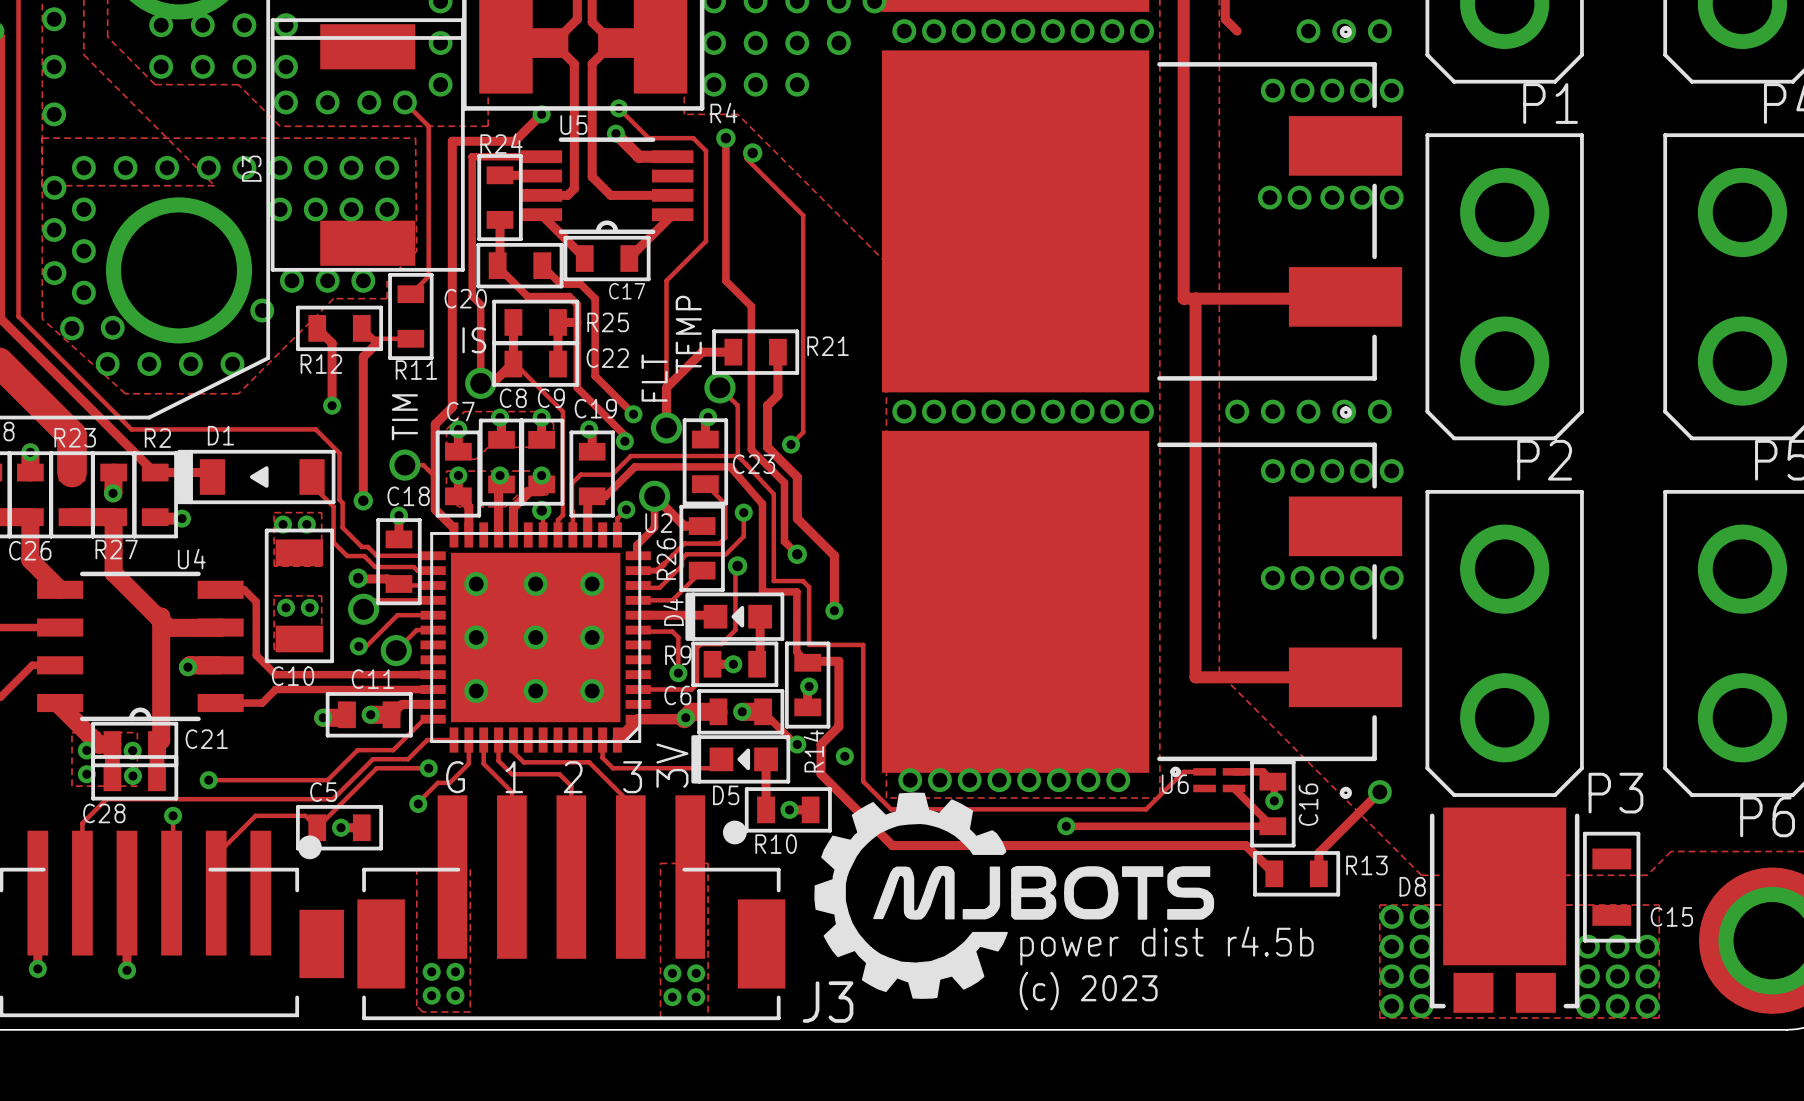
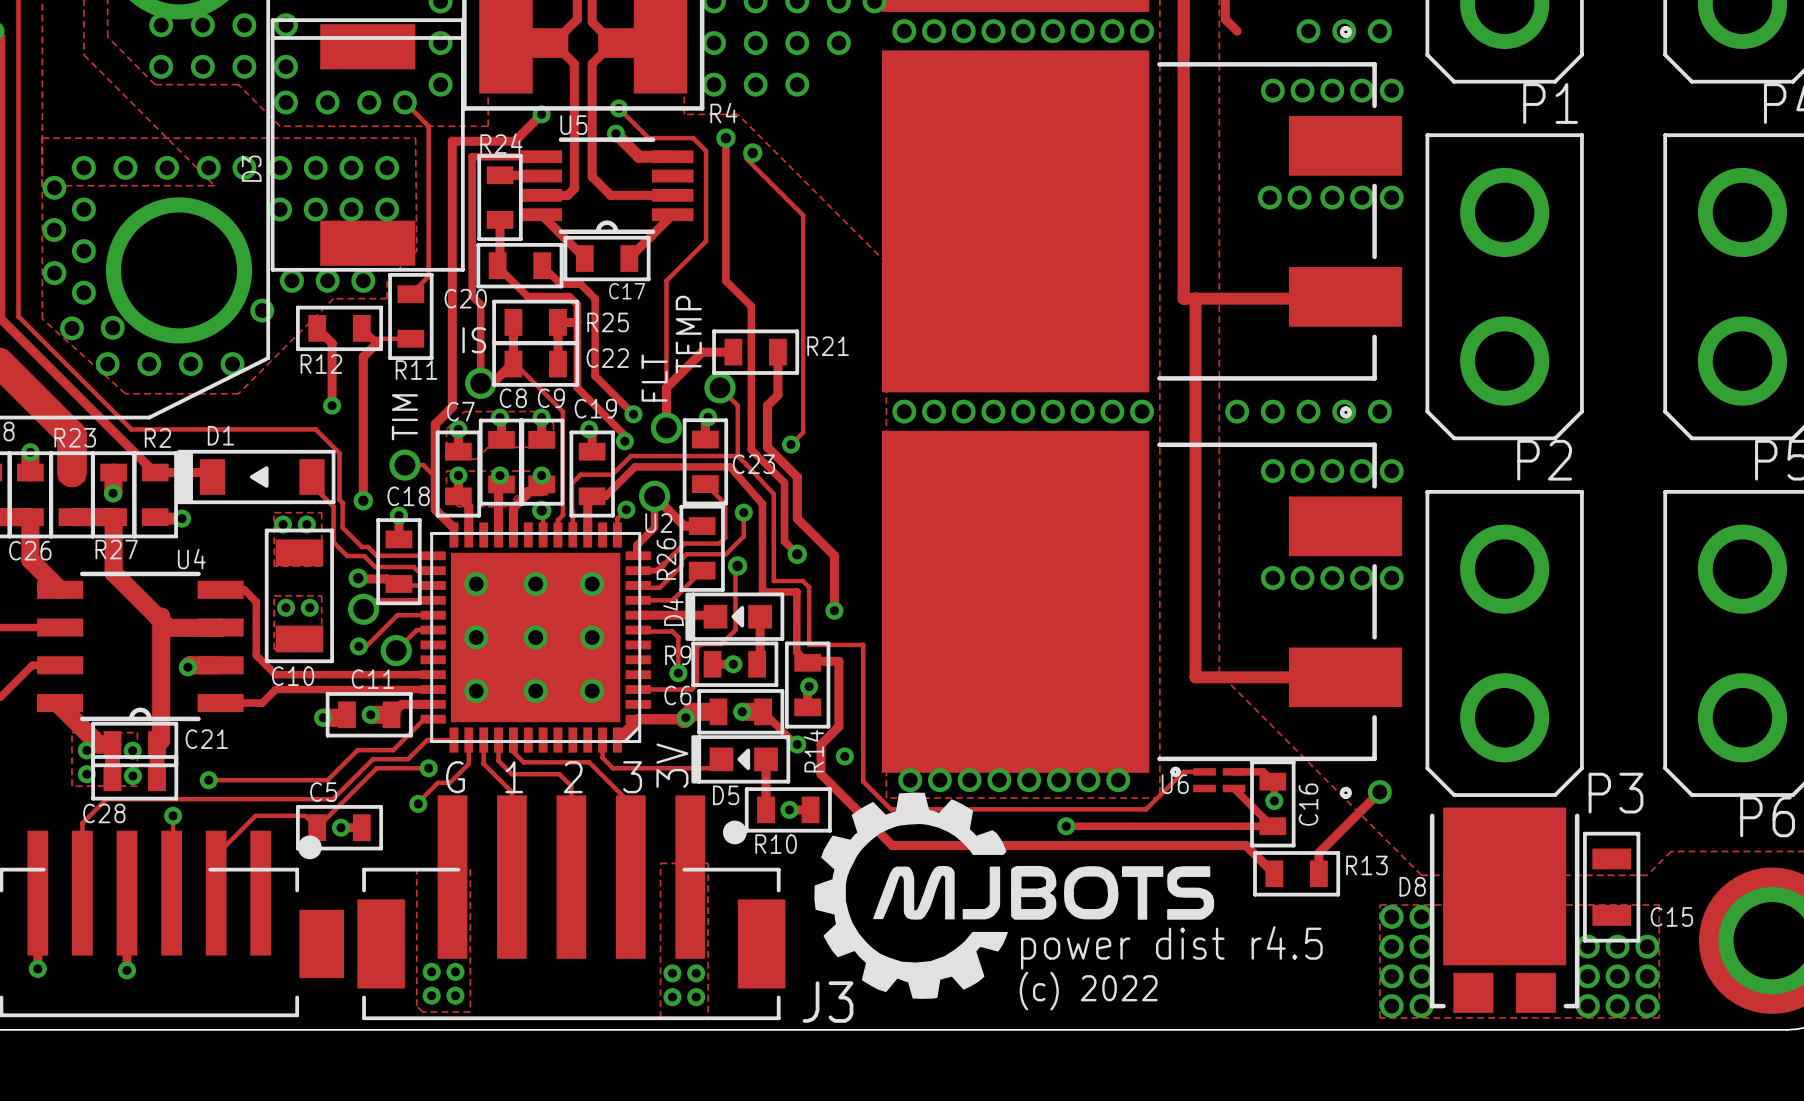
via: (54, 19) -> none
via: (54, 66) -> none
via: (54, 114) -> none
text: power dist r4.5b (1166, 945) -> power dist r4.5 (1171, 947)
text: (c) 2023 (1088, 991) -> (c) 2022 (1088, 991)

